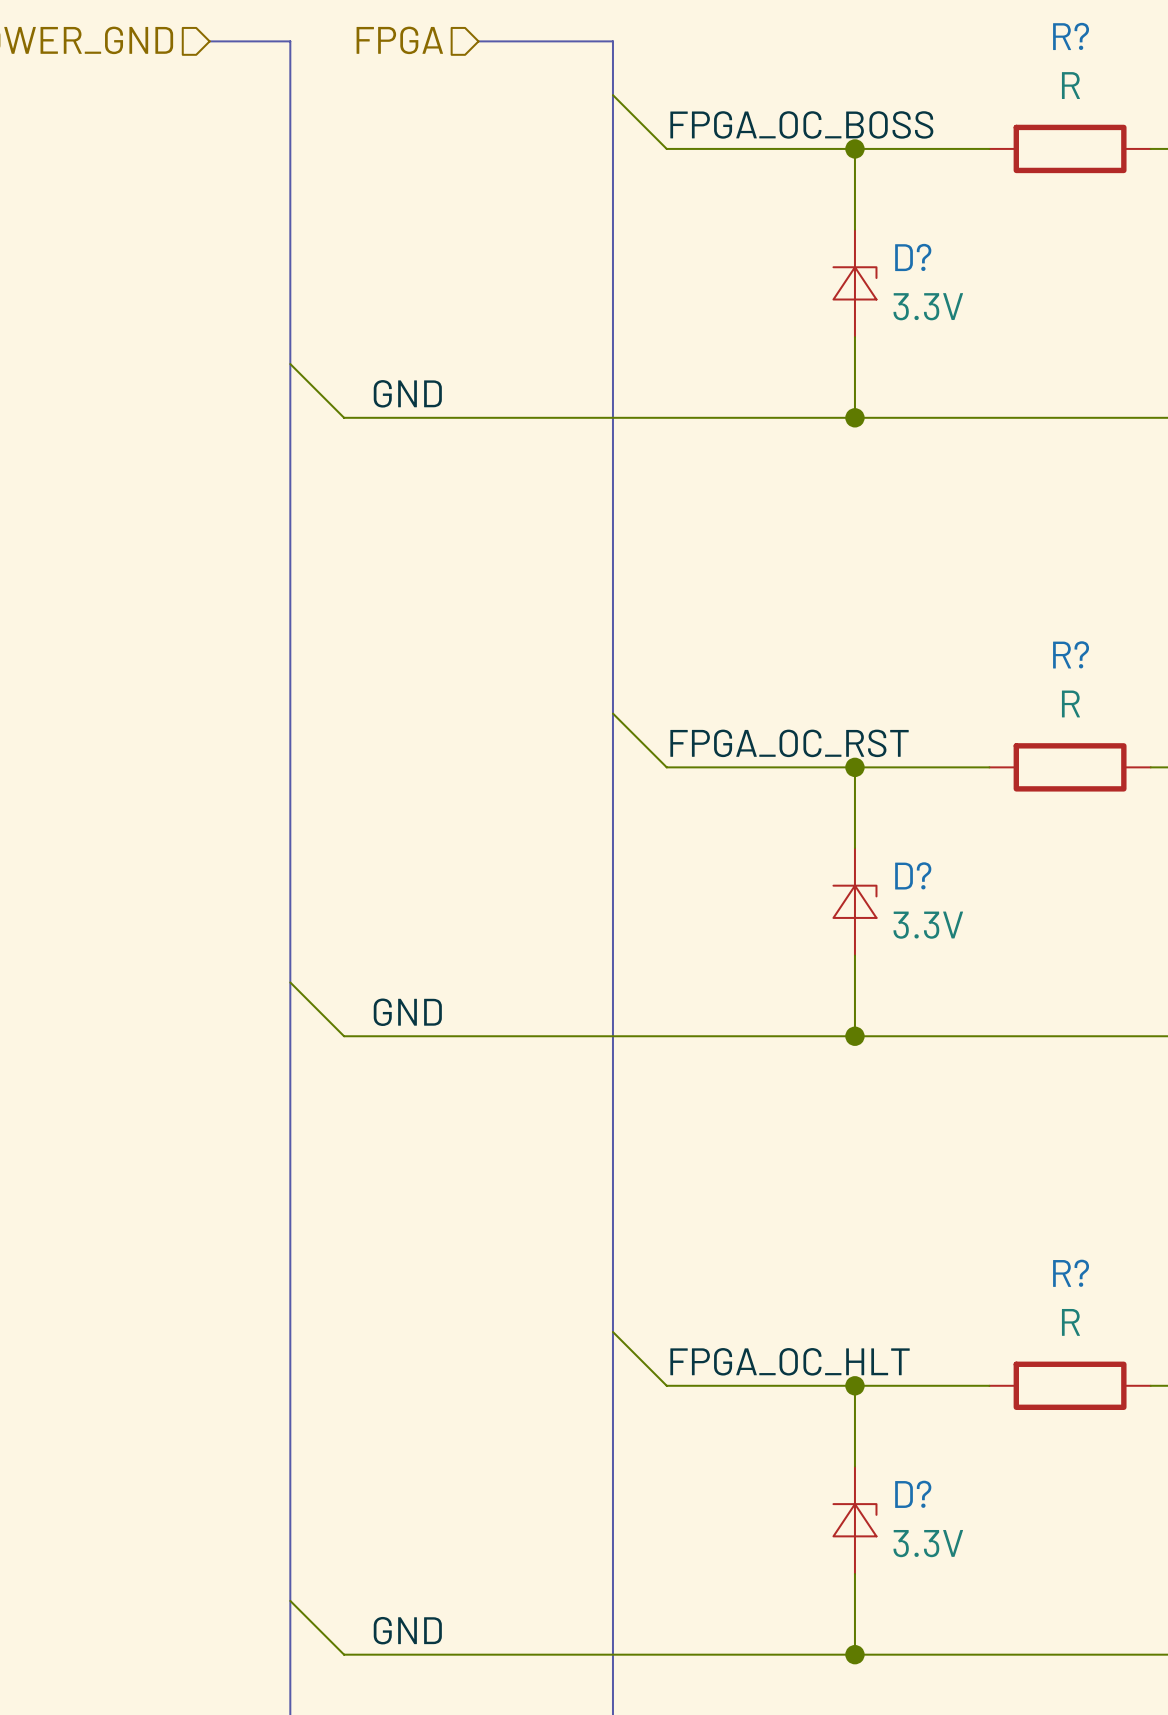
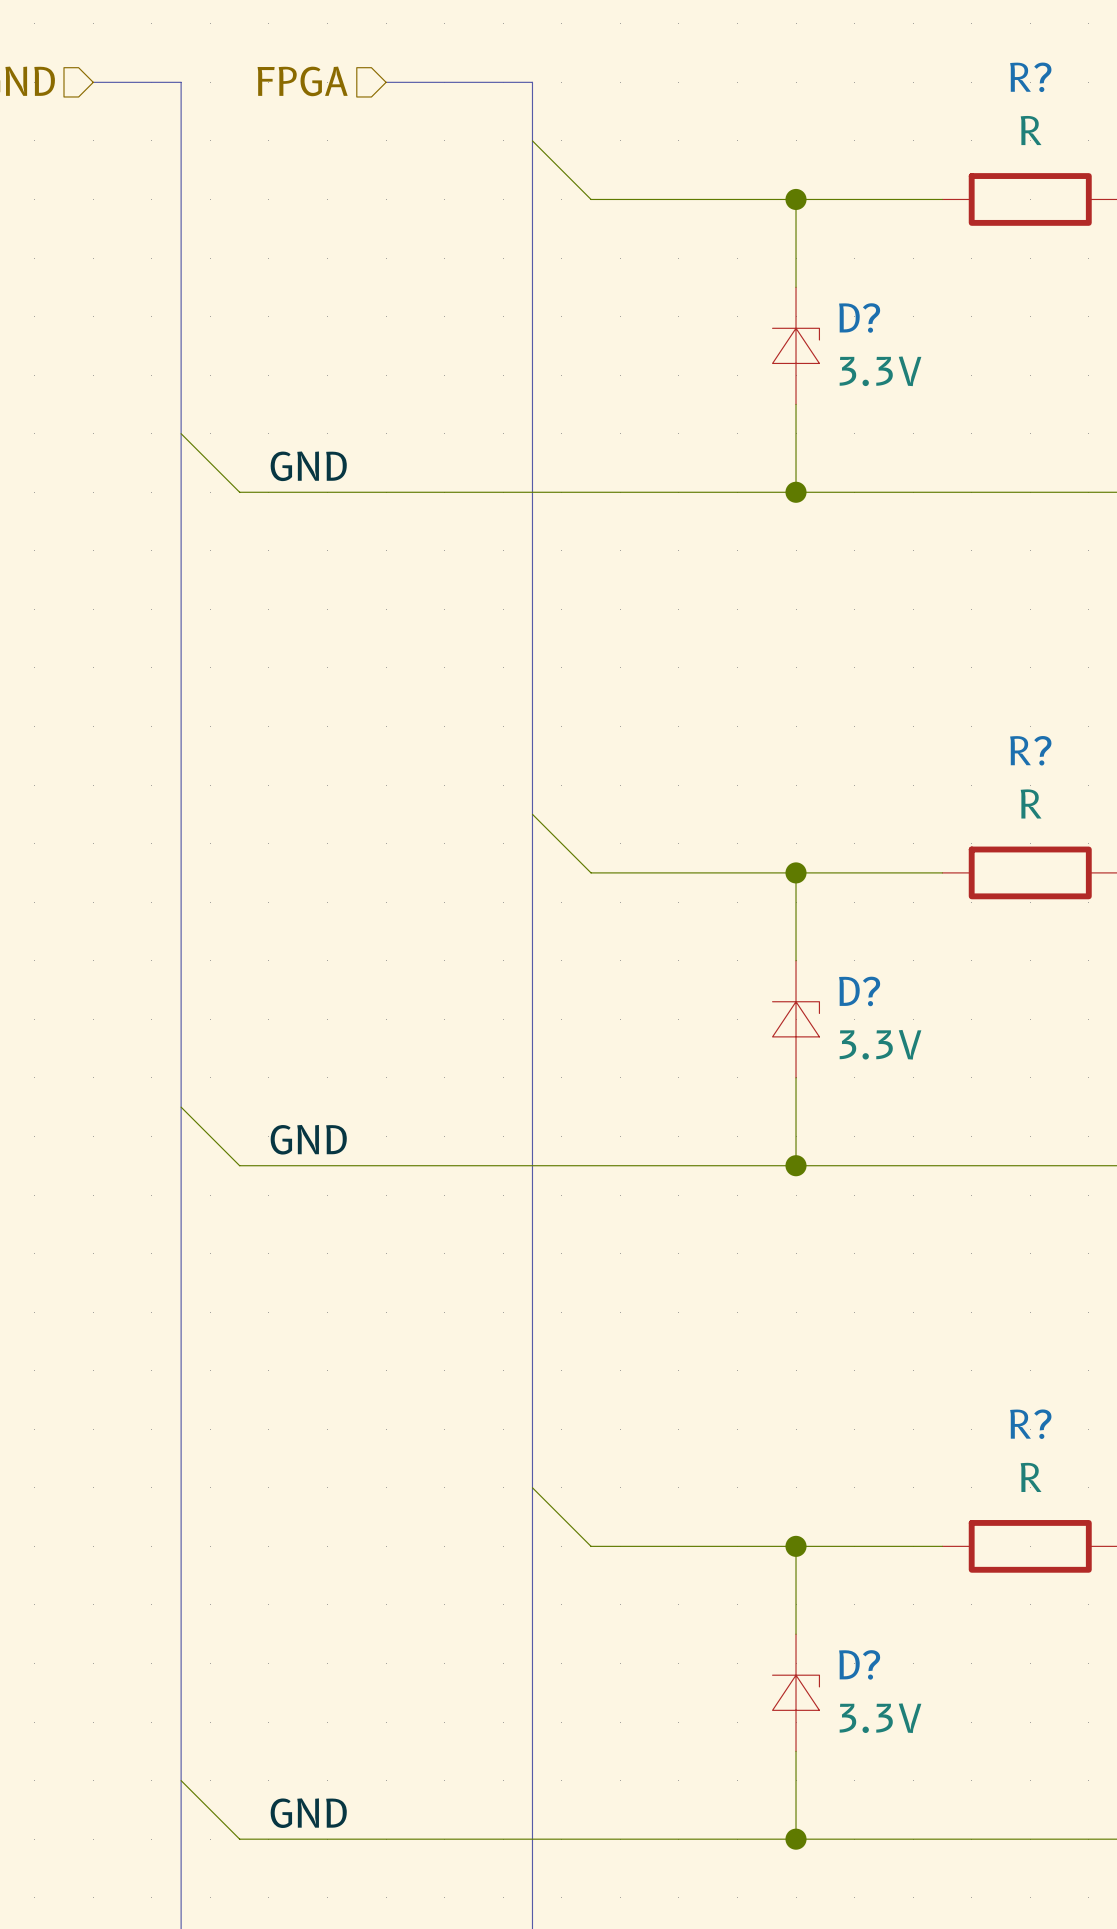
label: FPGA_OC_BOSS (801, 124) -> none
label: FPGA_OC_RST (789, 743) -> none
label: FPGA_OC_HLT (790, 1361) -> none

